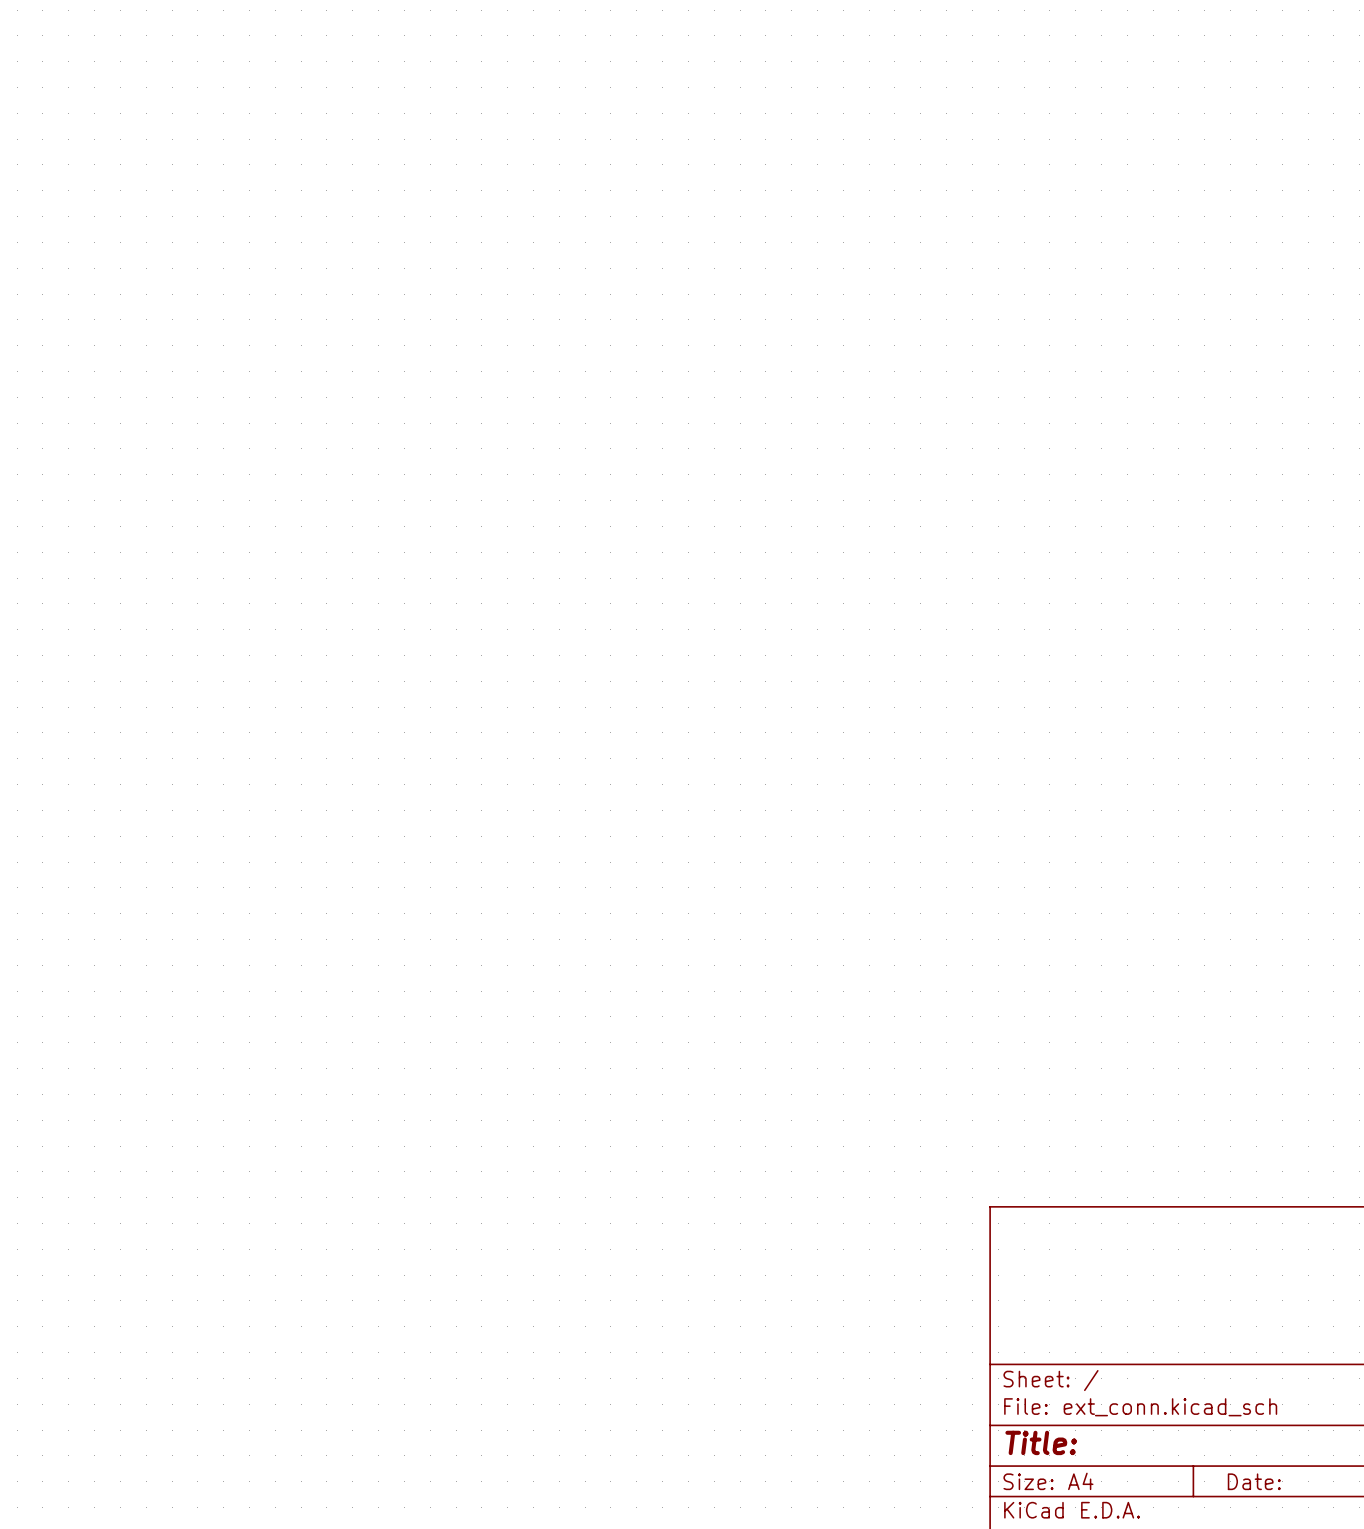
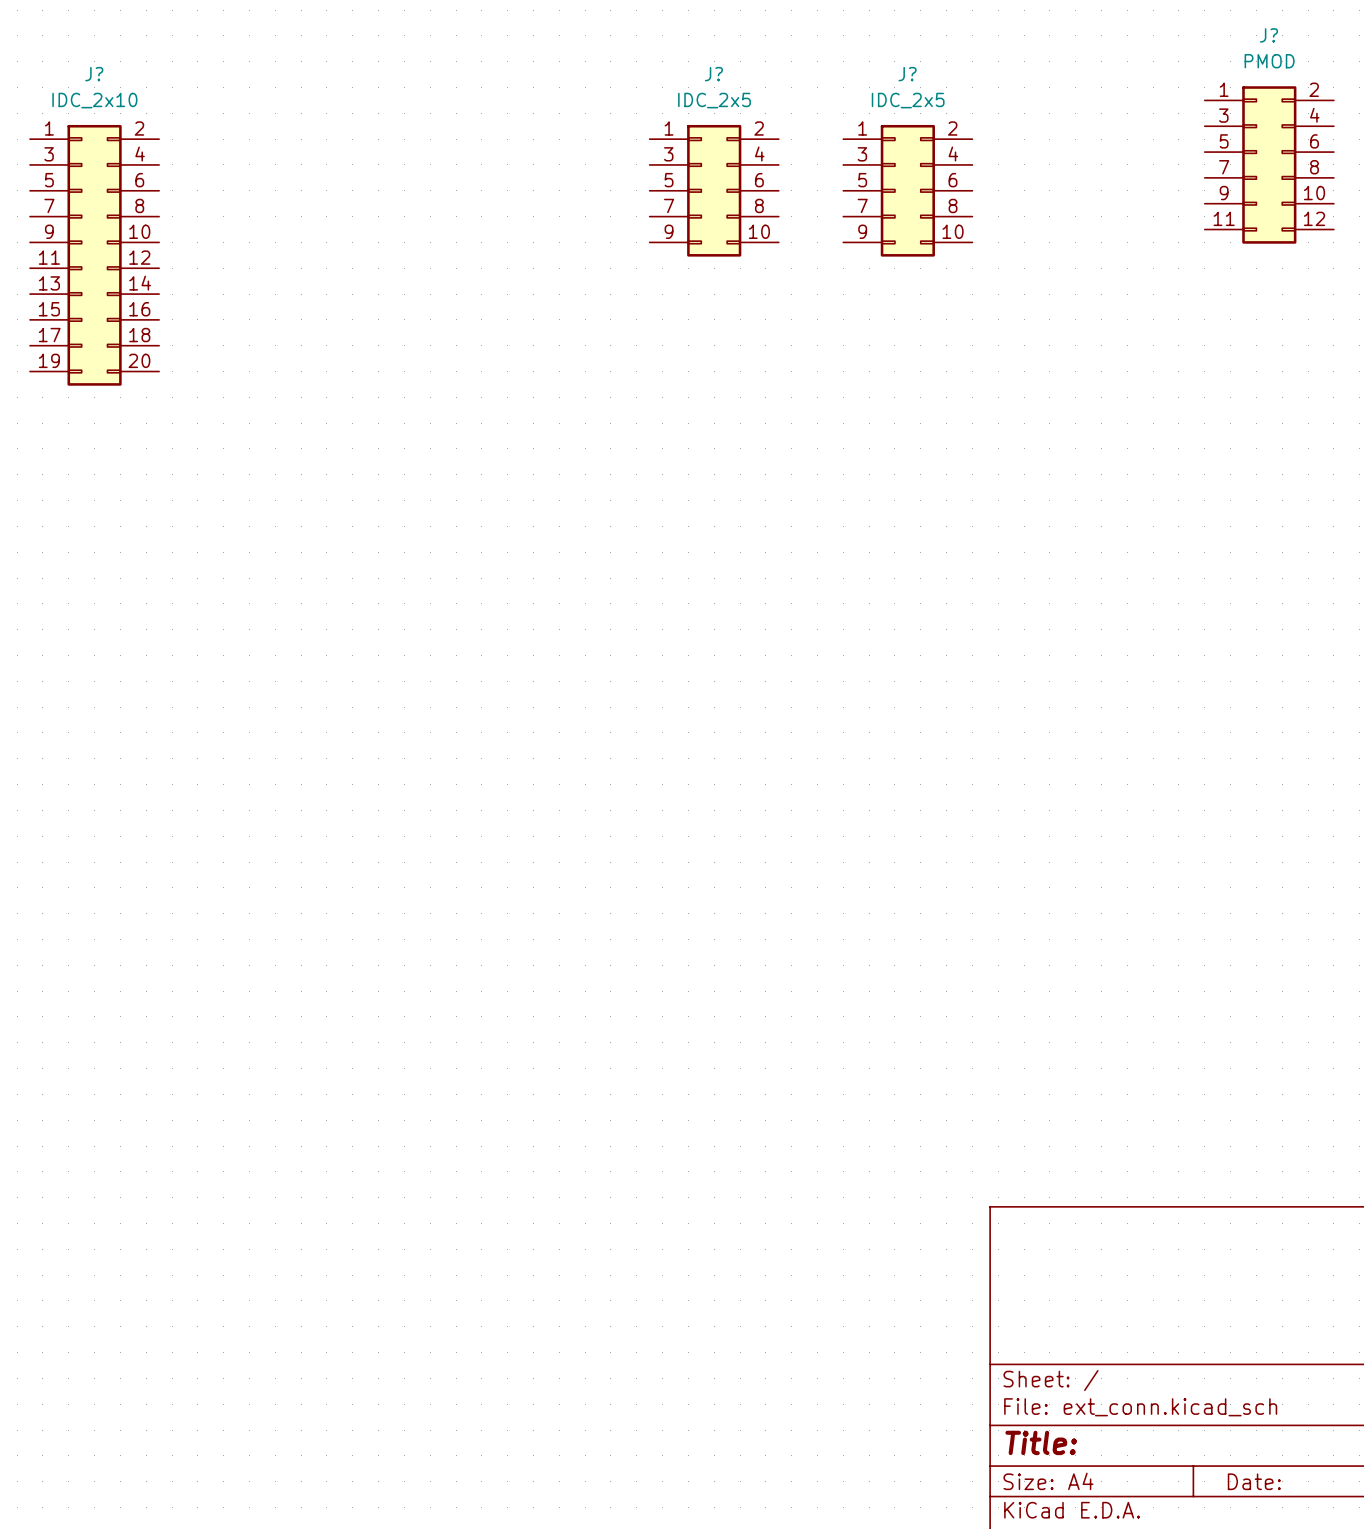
J?: none -> PMOD (1269, 164)
J?: none -> IDC_2x5 (714, 190)
J?: none -> IDC_2x5 (907, 190)
J?: none -> IDC_2x10 (94, 255)

